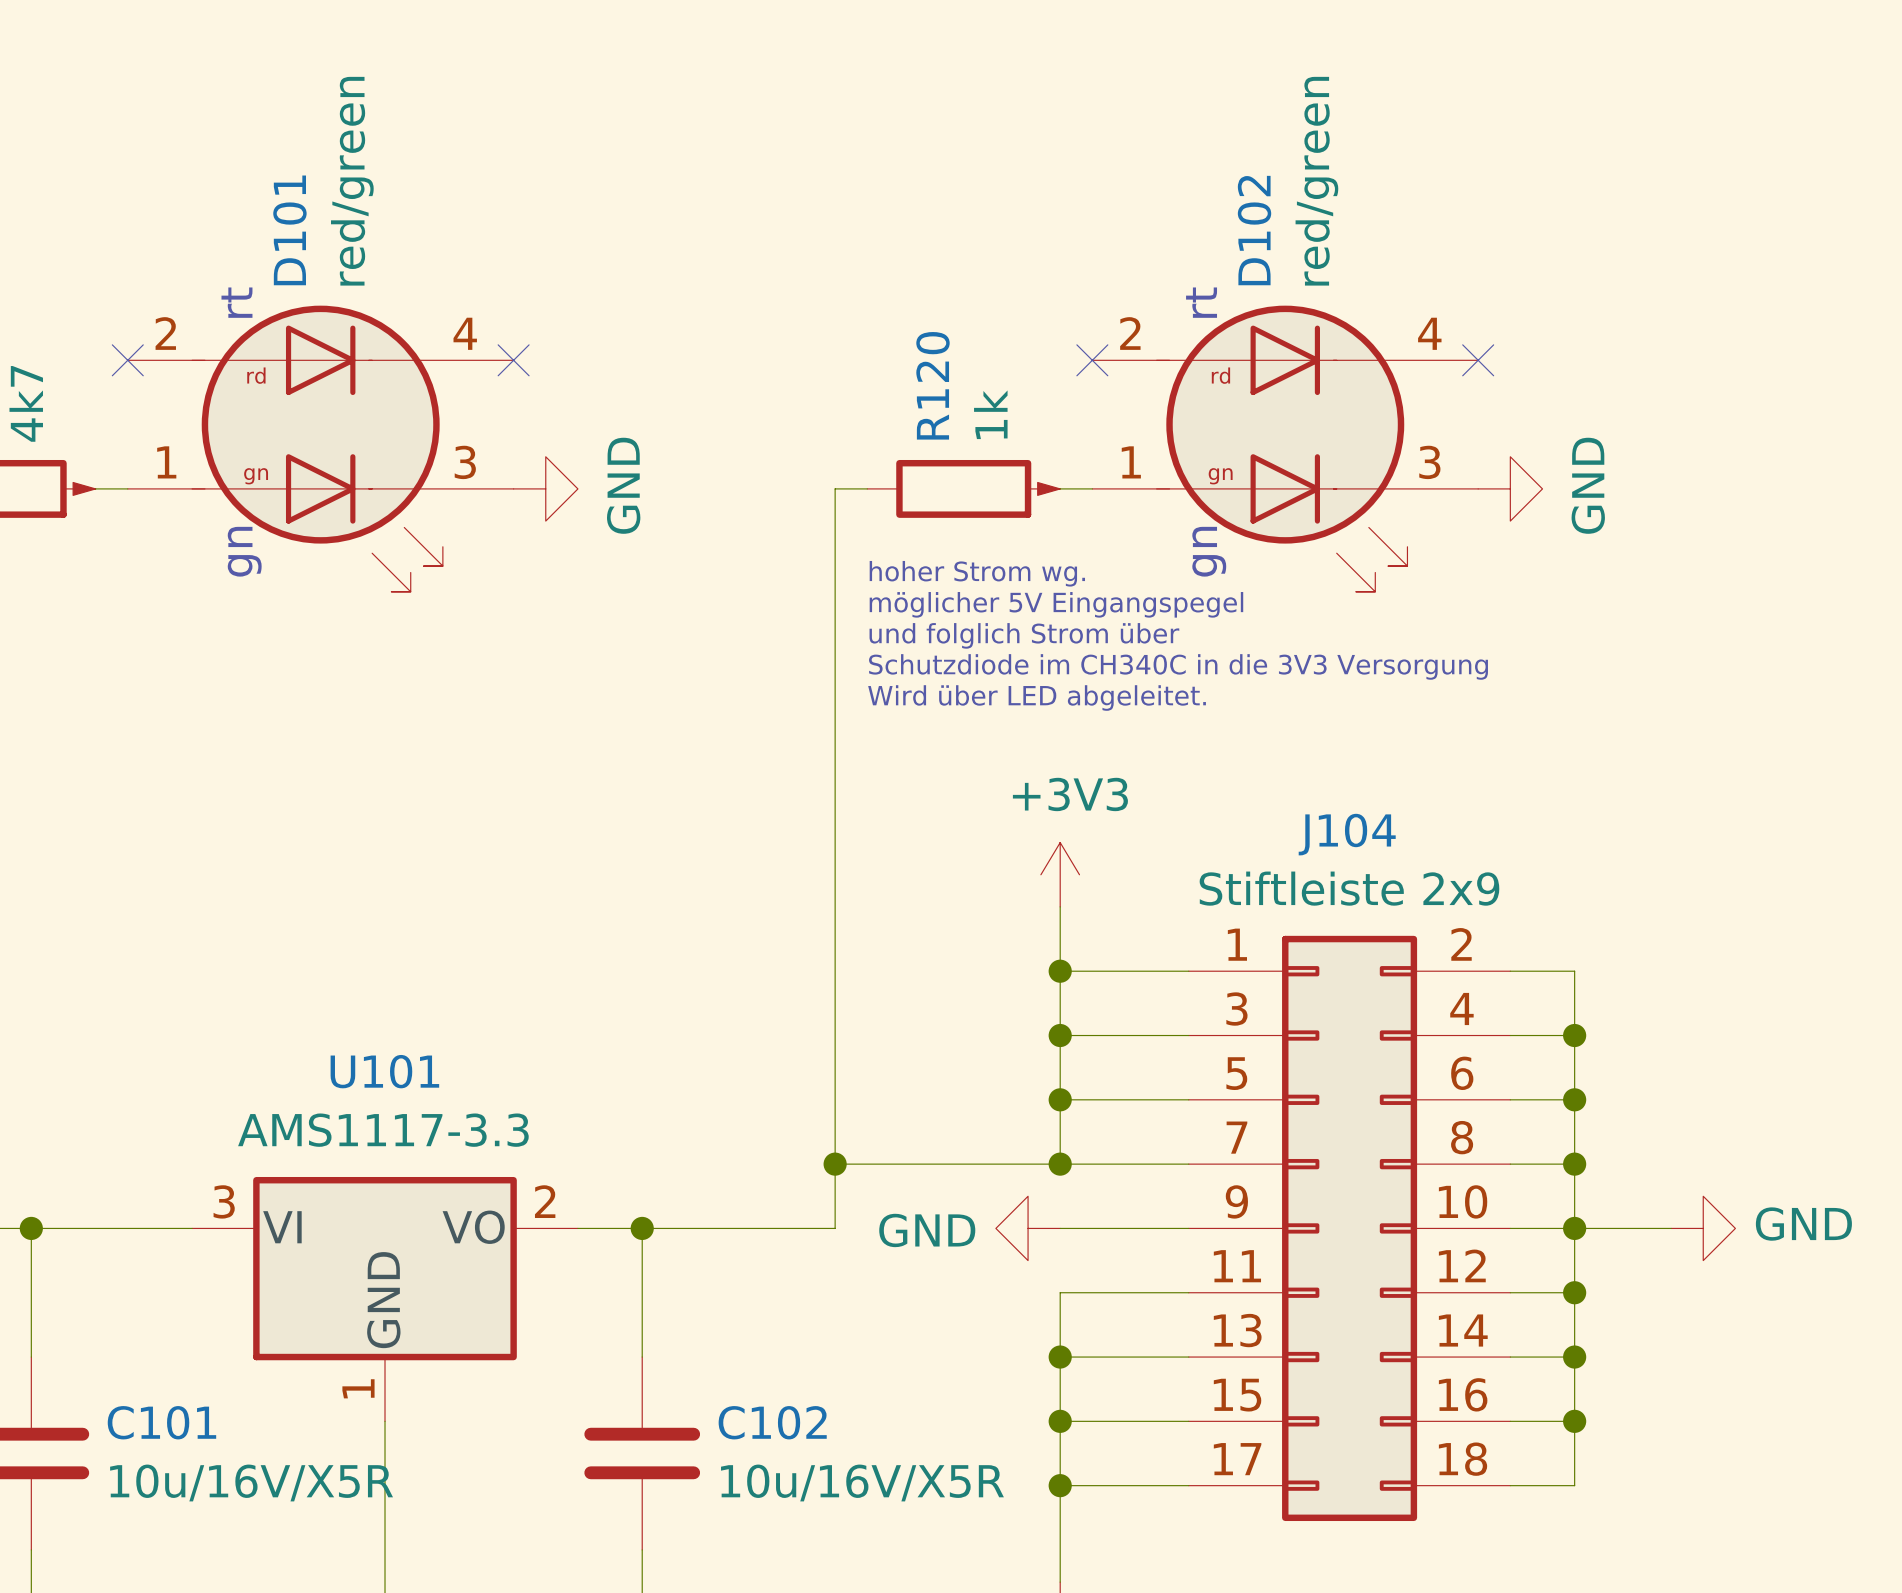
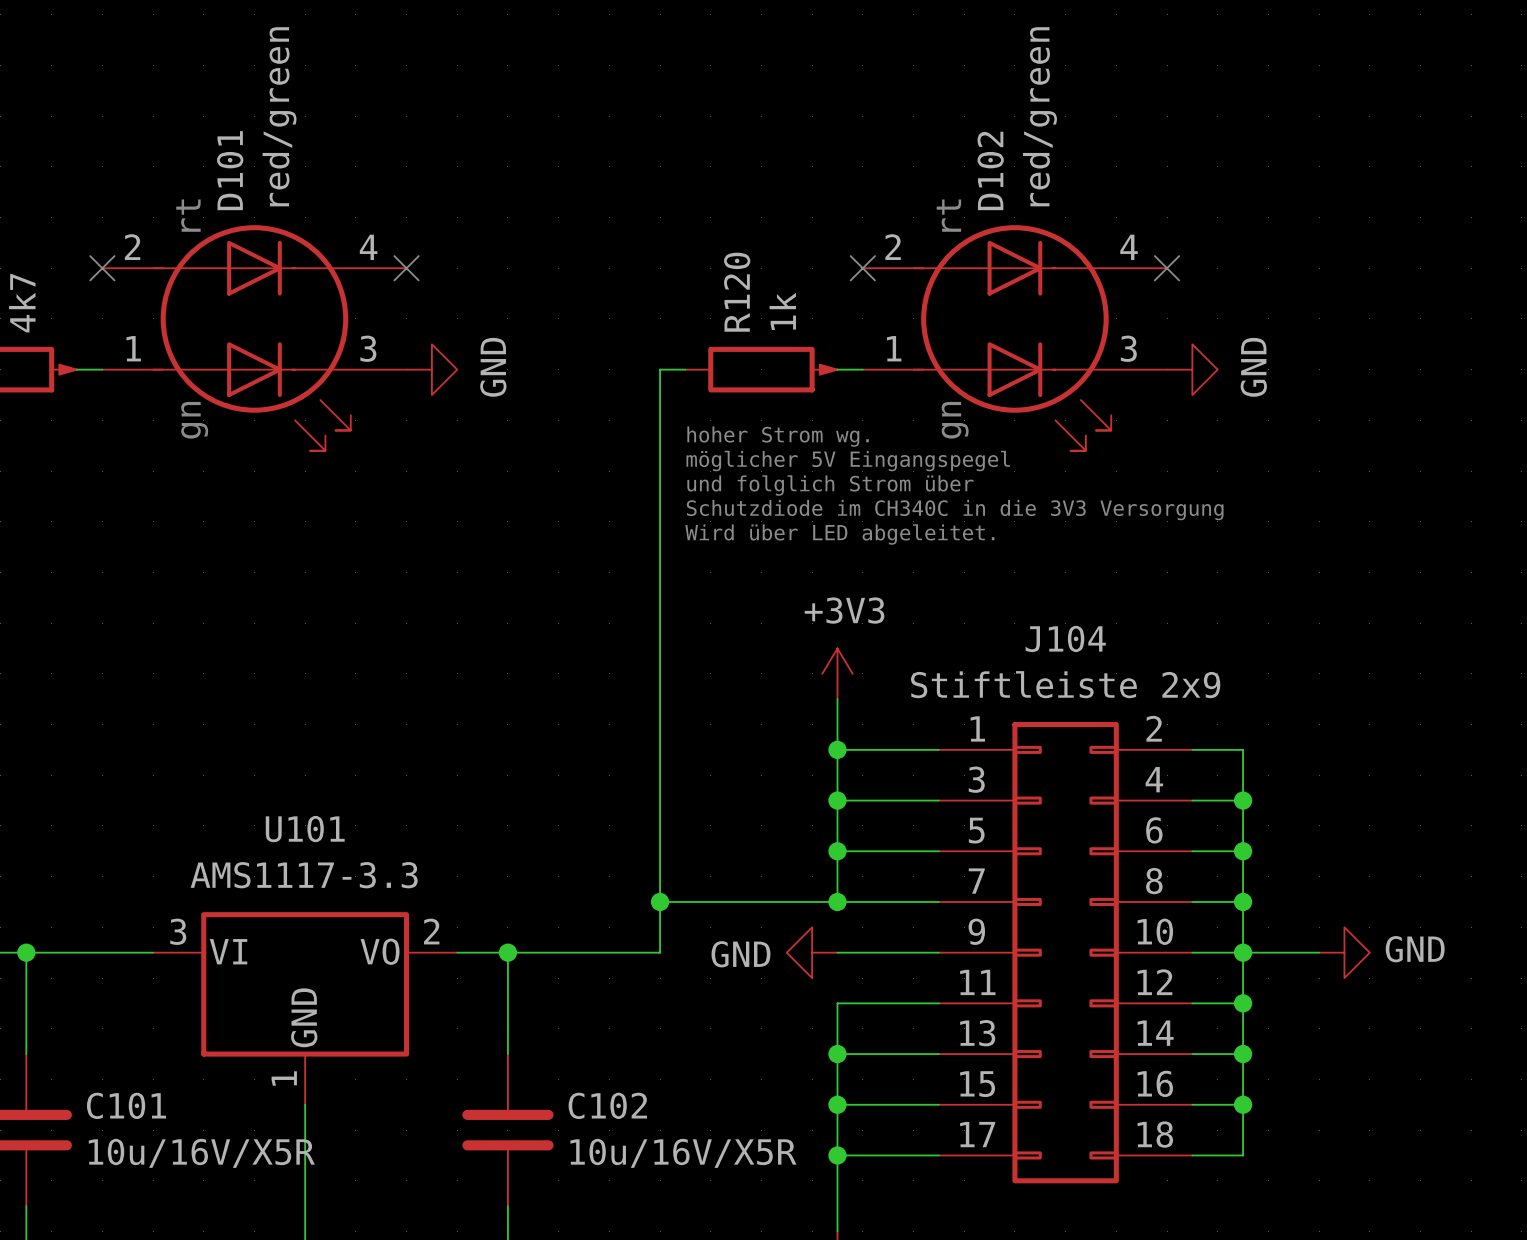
D101 text: rd (256, 375) -> none
D102 text: rd (1220, 375) -> none
D101 text: gn (256, 476) -> none
D102 text: gn (1220, 476) -> none

